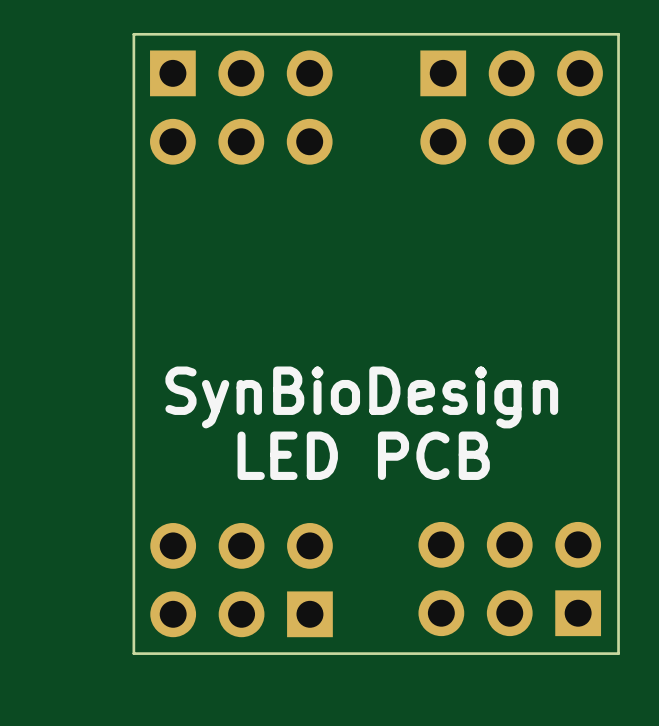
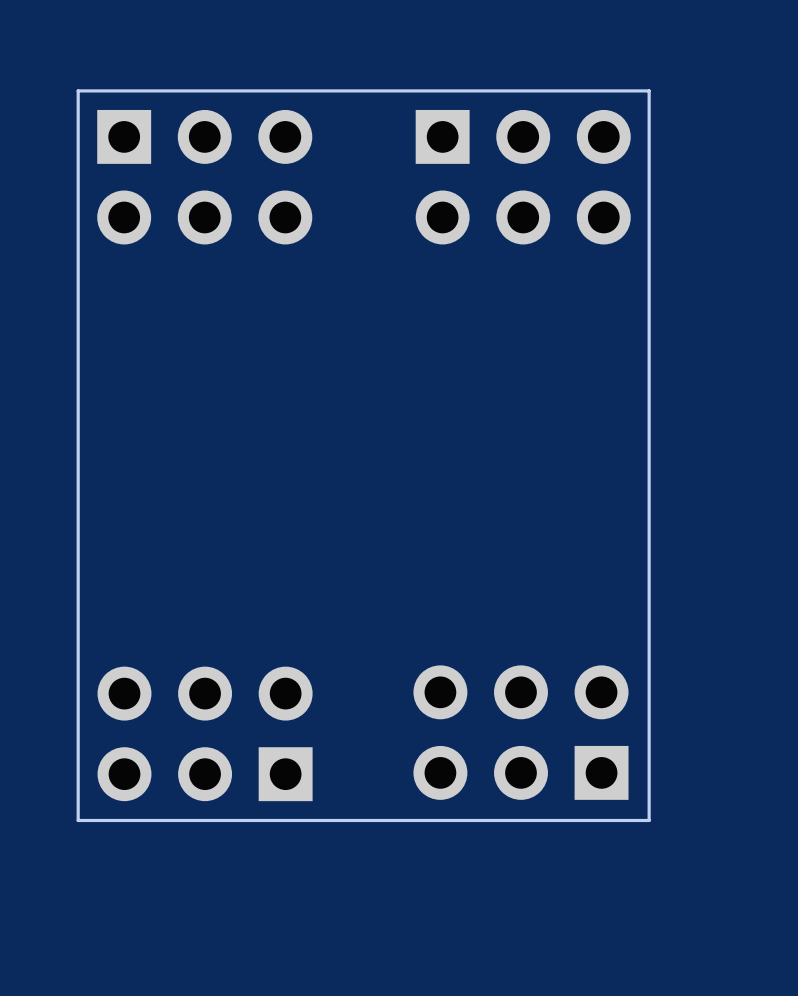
text: SynBioDesign (361, 397) -> none
text: LED PCB (363, 455) -> none

